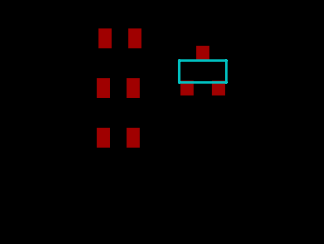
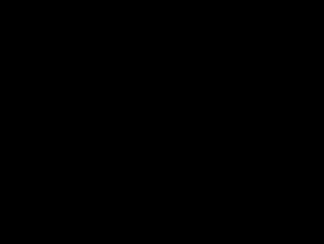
part: (119, 38) -> none
part: (202, 70) -> none
part: (118, 88) -> none
part: (118, 137) -> none

